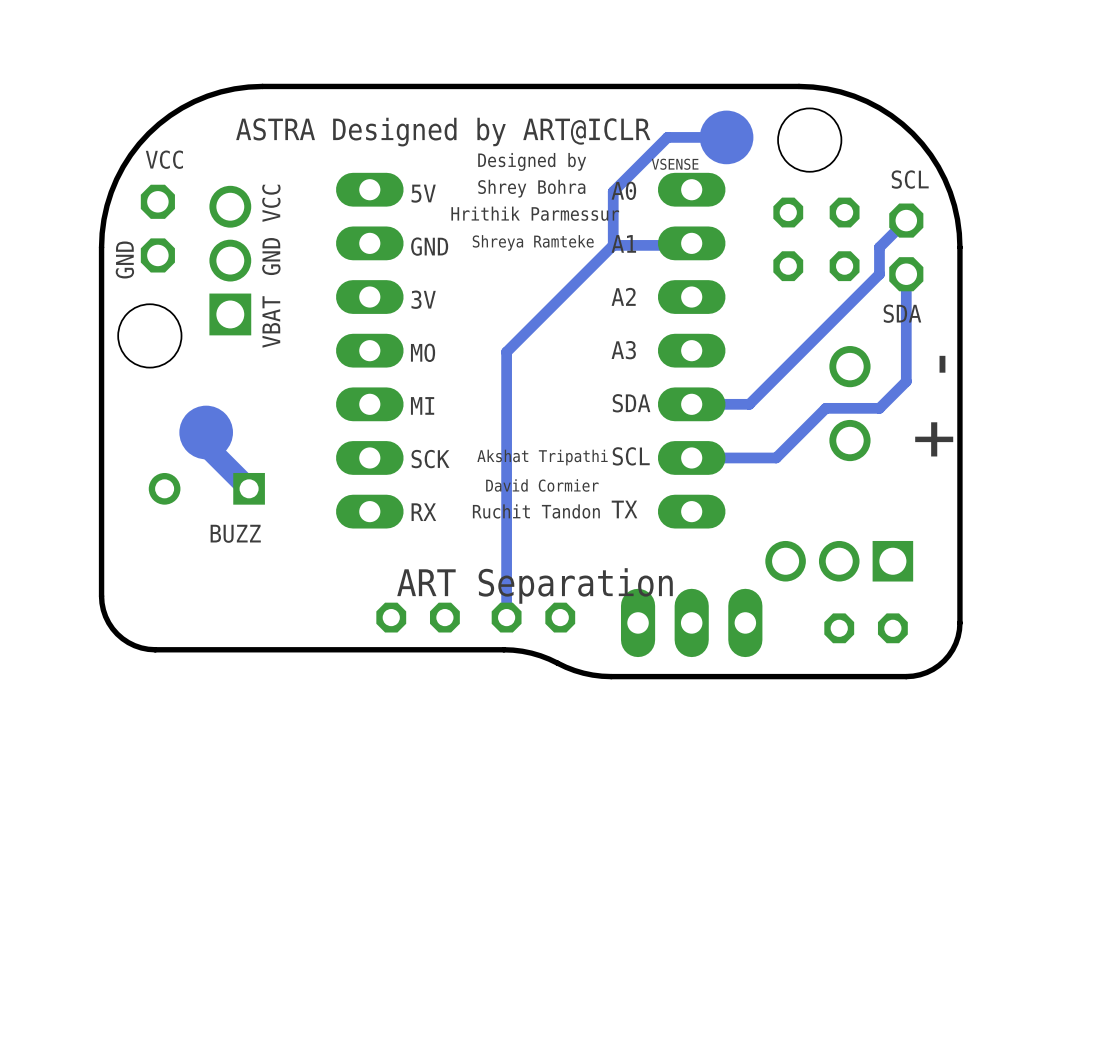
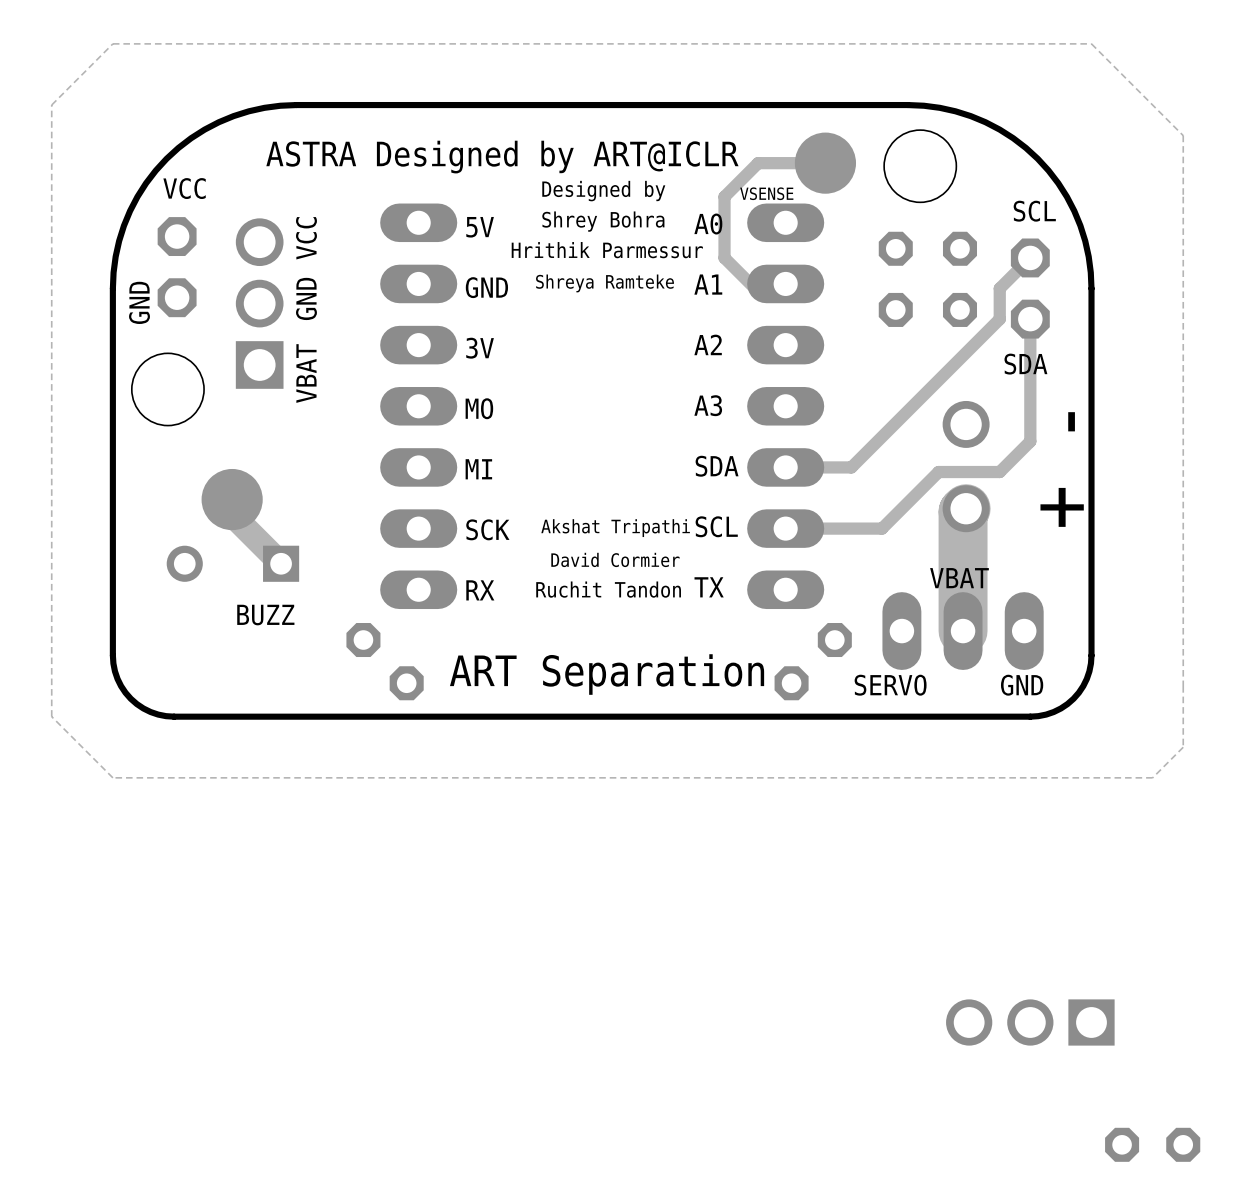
zone outline: none -> (1091, 43) (112, 43) (51, 105) (51, 716) (112, 777) (1152, 777) (1183, 747) (1183, 135) (1091, 43)
track: (638, 166) (613, 191) (613, 245) -> (724, 196) (724, 257) (755, 288)
track: (613, 245) (506, 352) (506, 617) -> none
track: (689, 245) (613, 245) -> none
track: none -> (966, 508) (963, 511) (963, 631)
text: none -> VBAT (959, 578)
part footprint: [765, 540, 914, 582] -> [882, 592, 1044, 670]
board edge: (959, 569) (959, 629) (952, 649) (944, 660) (933, 669) (920, 674) (906, 676) (601, 676) (574, 670) (531, 653) (503, 649) (148, 649) (134, 645) (122, 638) (108, 622) (102, 603) (101, 569) -> (1091, 655) (1086, 678) (1073, 698) (1053, 712) (1030, 716) (166, 716) (150, 712) (130, 698) (117, 678) (112, 655)
part: none -> (385, 661)
part: none -> (813, 661)
text: none -> SERVO (890, 685)
text: none -> GND (1022, 685)
part: (418, 617) -> none
part: (533, 617) -> none
part: (691, 622) -> none
part: (866, 628) -> none
part: none -> (1030, 1022)
part: none -> (1152, 1144)

